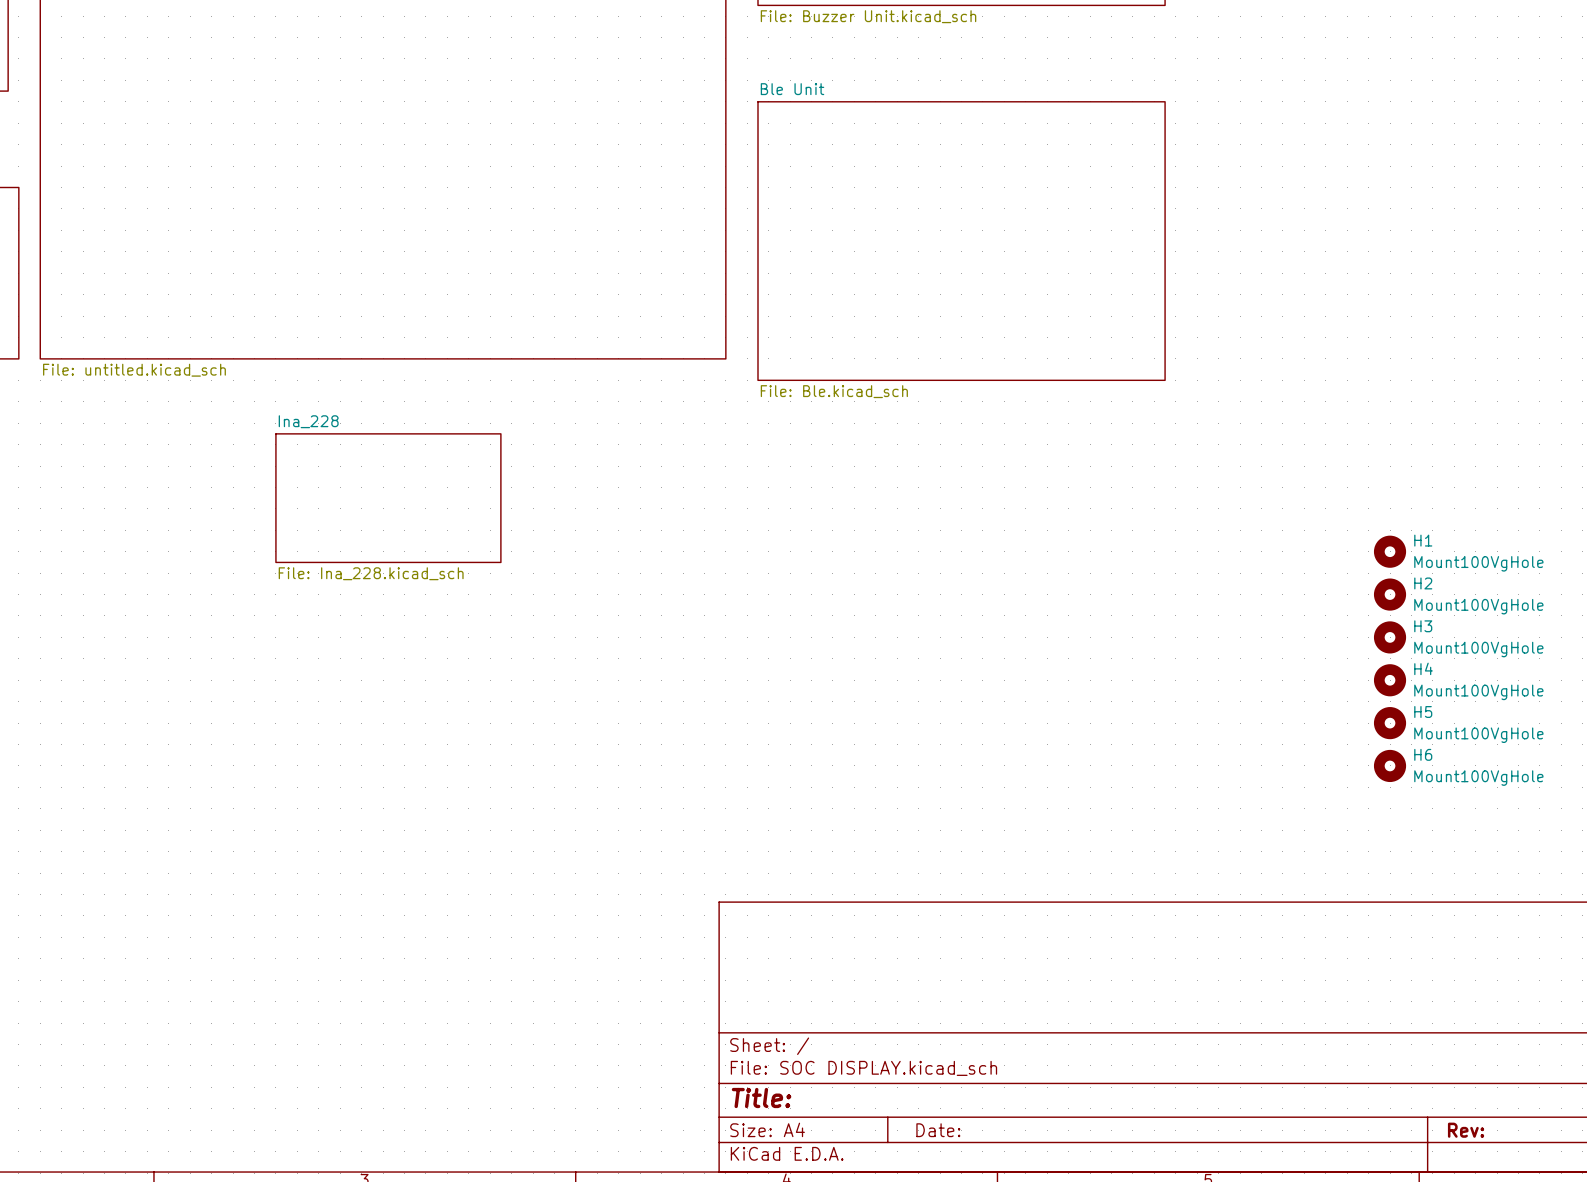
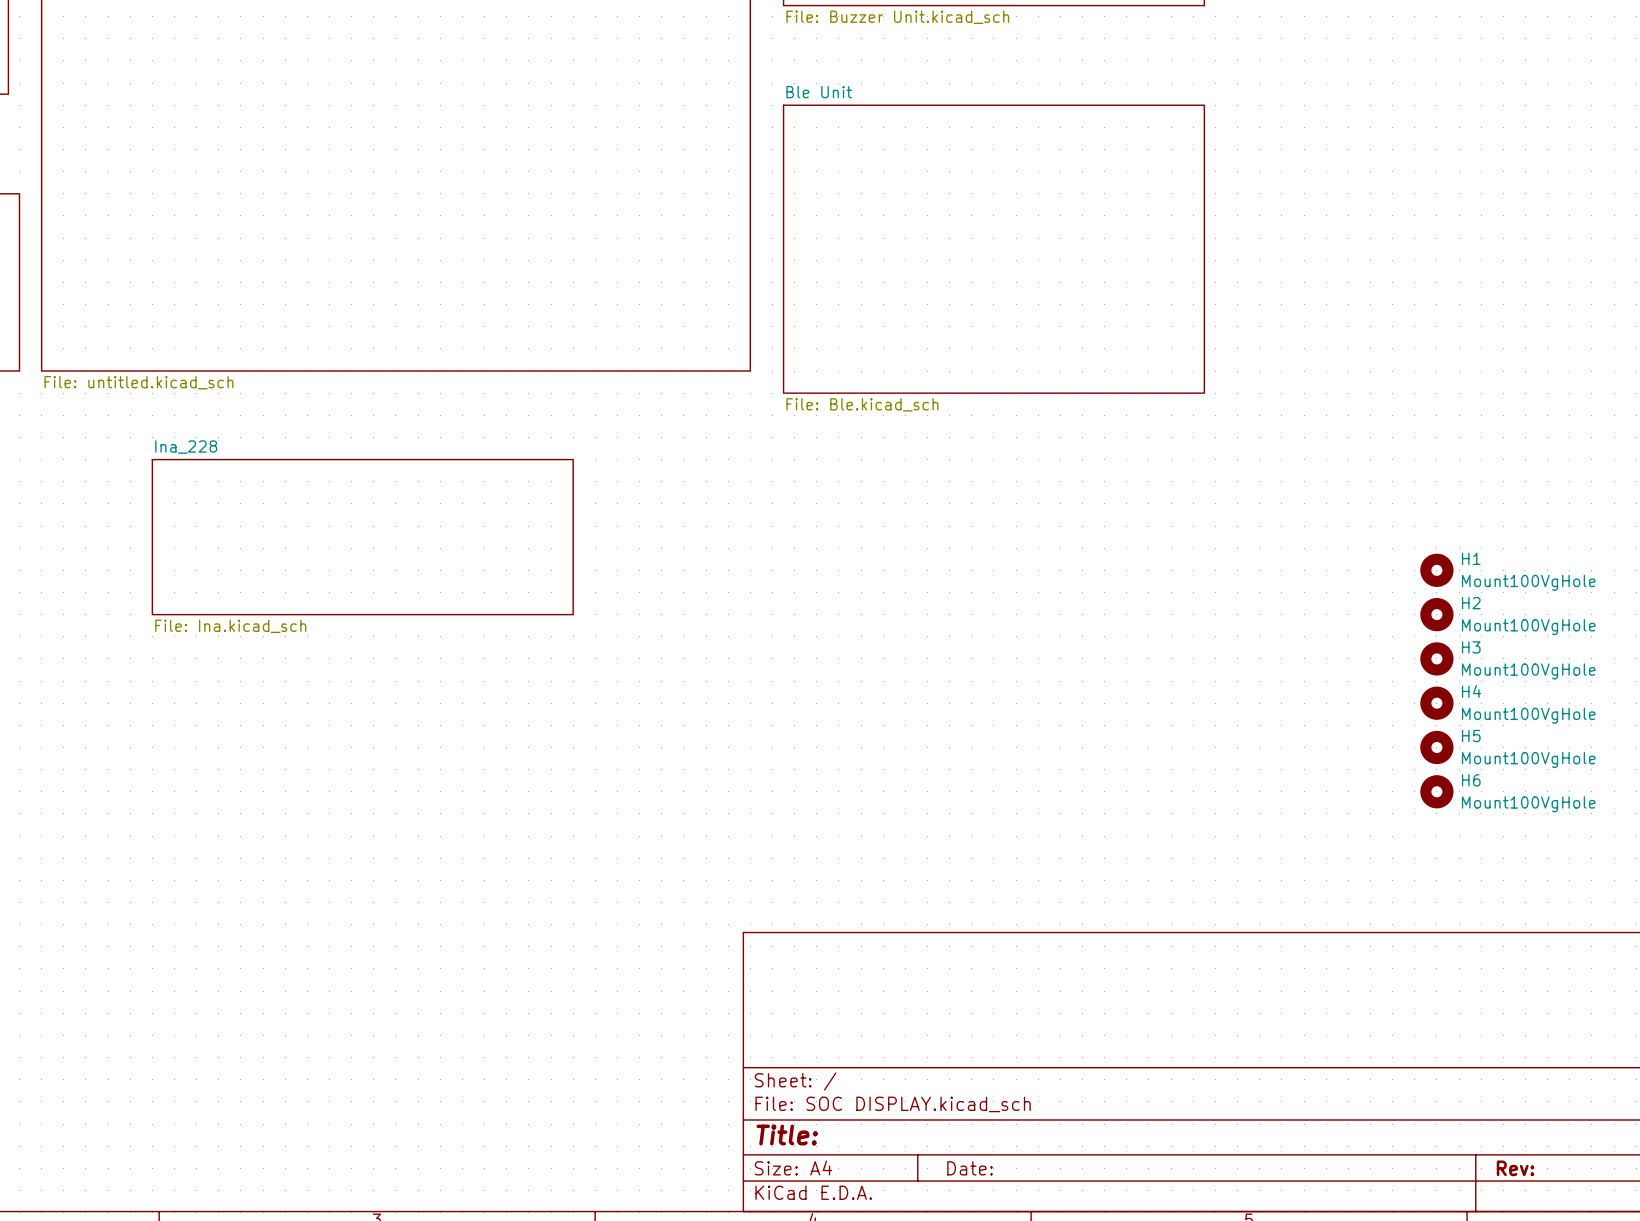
sheet Ina_228 name position: Ina_228 (308, 421) -> Ina_228 (186, 447)
sheet Ina_228 shape: [275, 433, 502, 564] -> [151, 458, 574, 616]
sheet Ina_228 value: File: Ina_228.kicad_sch (371, 573) -> File: Ina.kicad_sch (230, 626)

